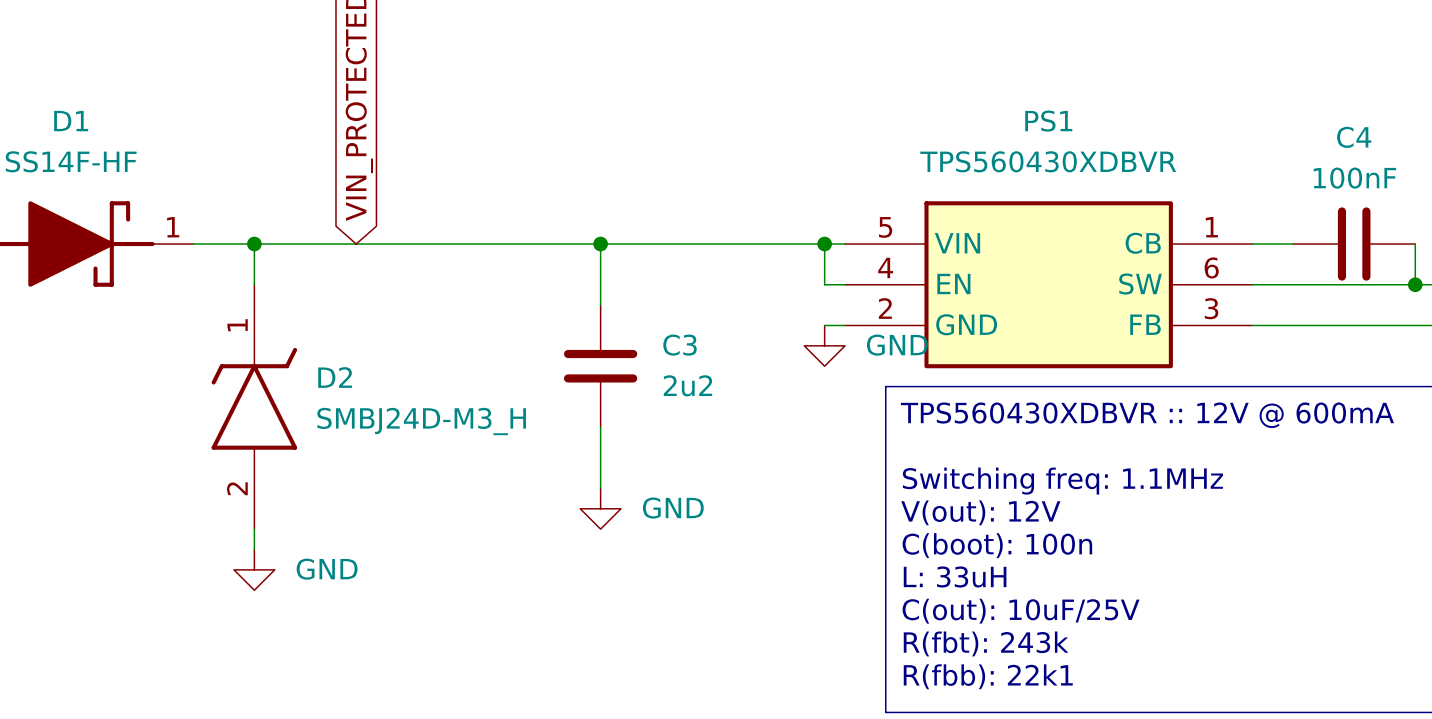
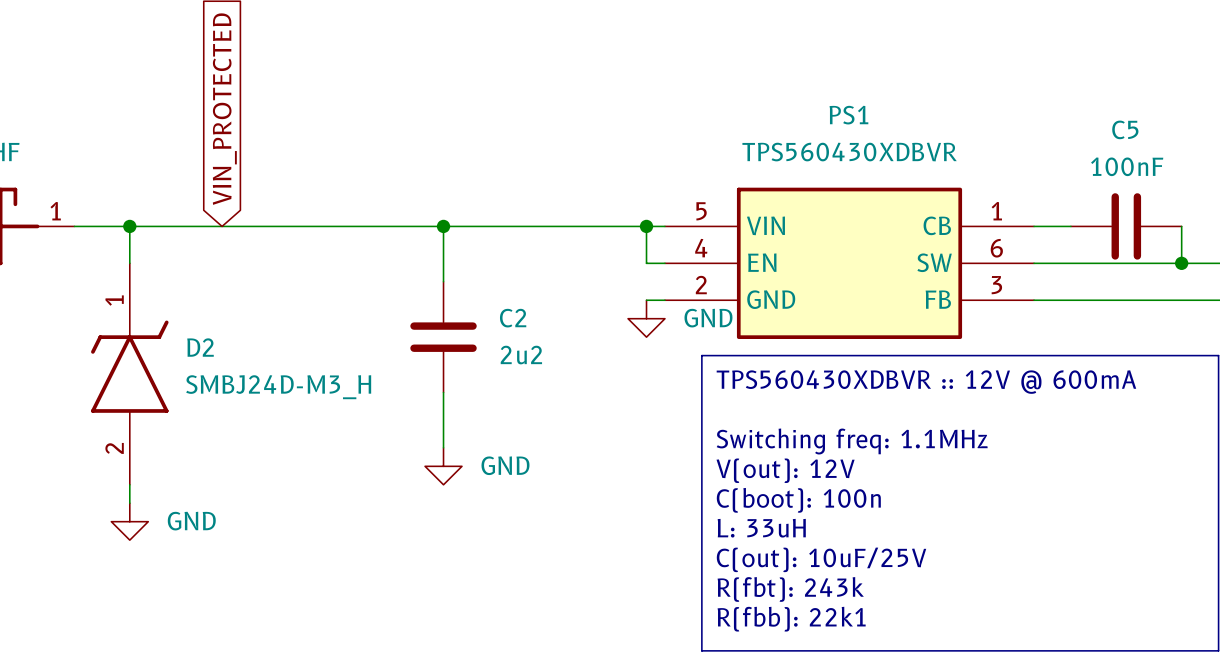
C4 name: C4 (1354, 137) -> C5 (1125, 129)
C3 name: C3 (680, 345) -> C2 (513, 318)

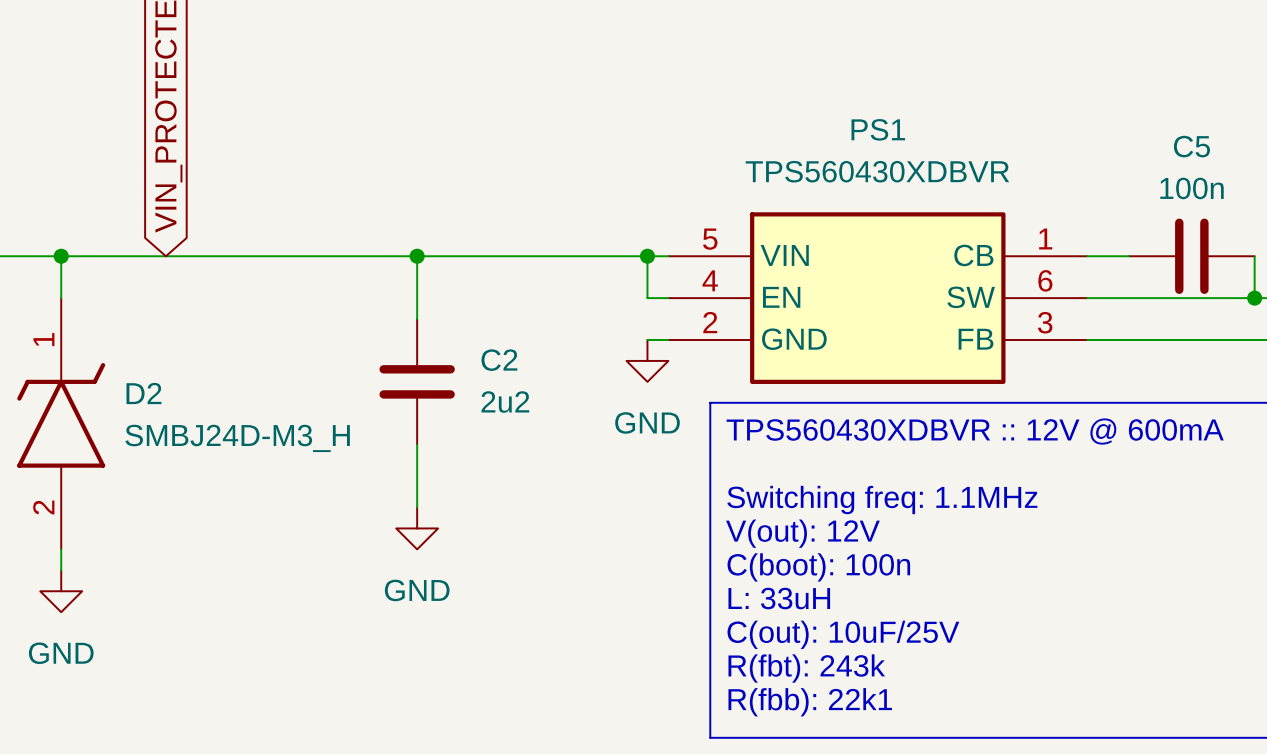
C5 value: 100nF (1127, 166) -> 100n (1192, 188)
power symbol text position: GND (708, 318) -> GND (647, 422)
power symbol text position: GND (505, 465) -> GND (417, 590)
power symbol text position: GND (191, 521) -> GND (61, 653)

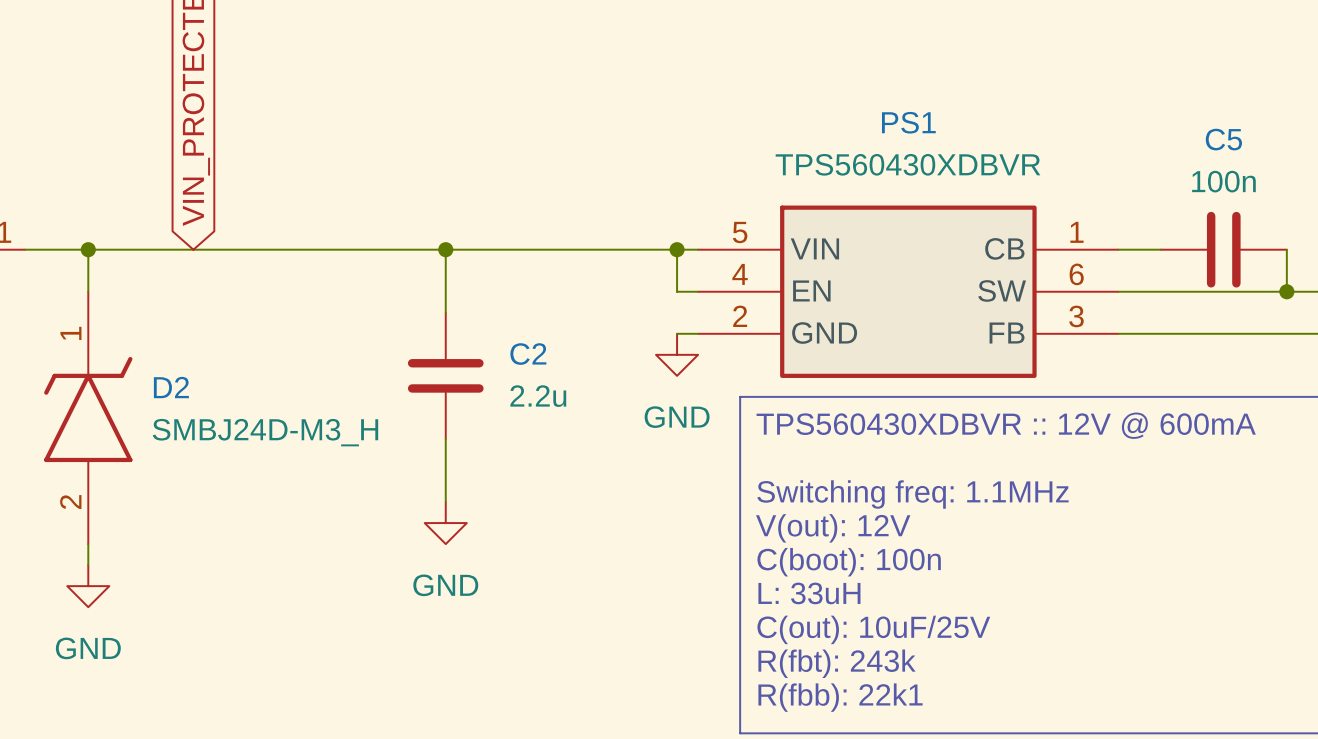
C2 value: 2u2 (505, 402) -> 2.2u (538, 396)

